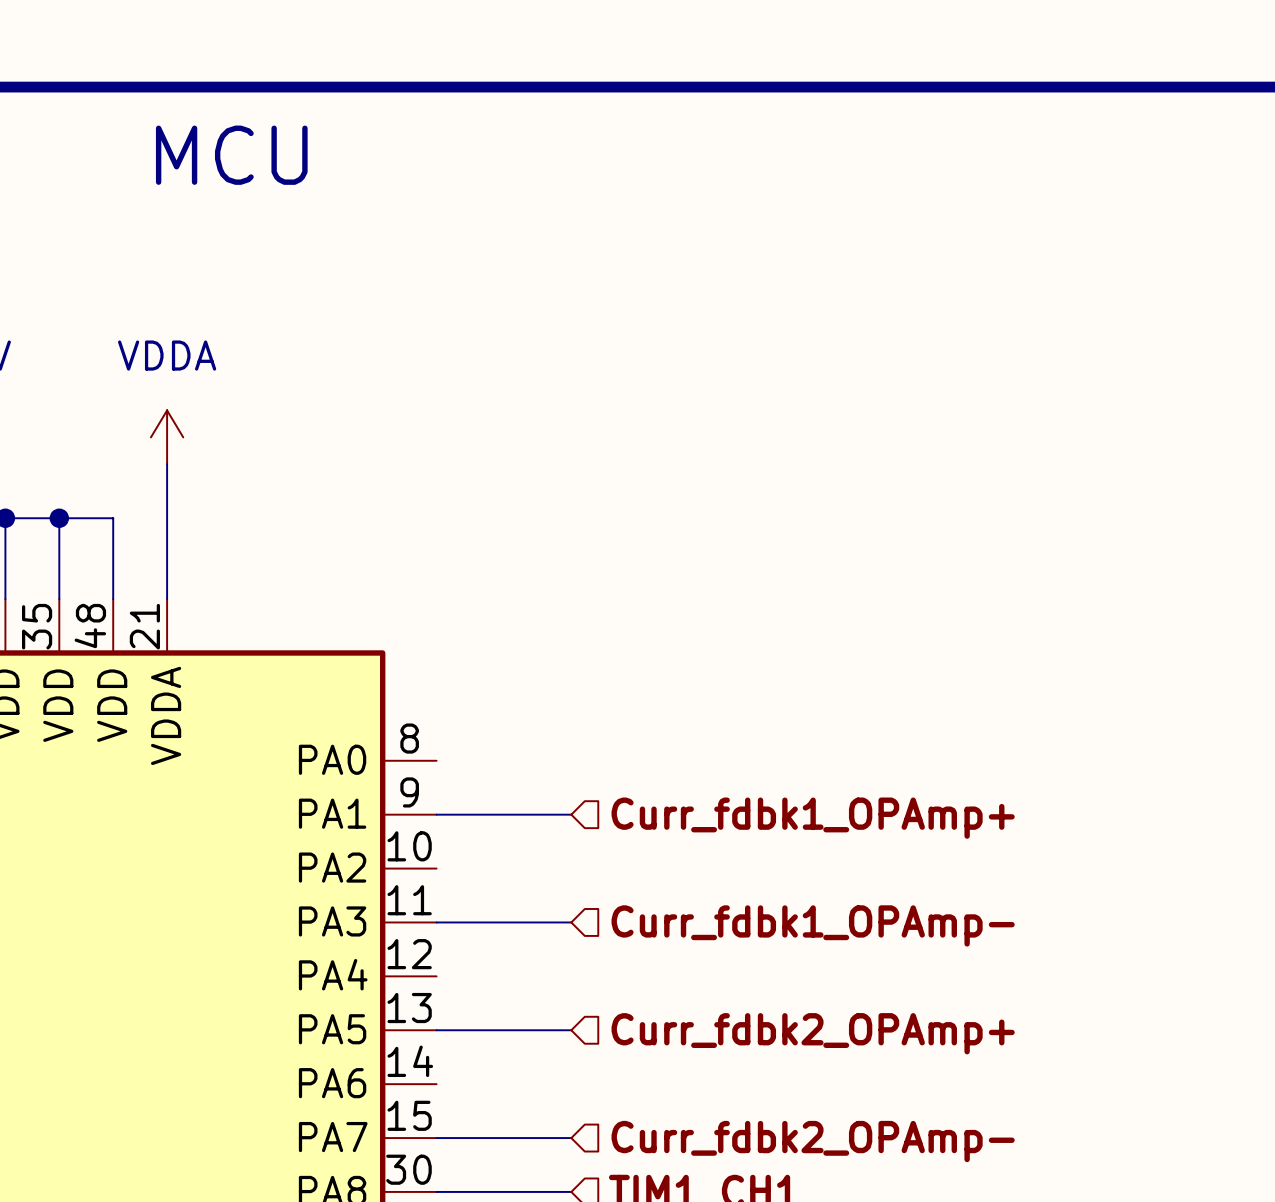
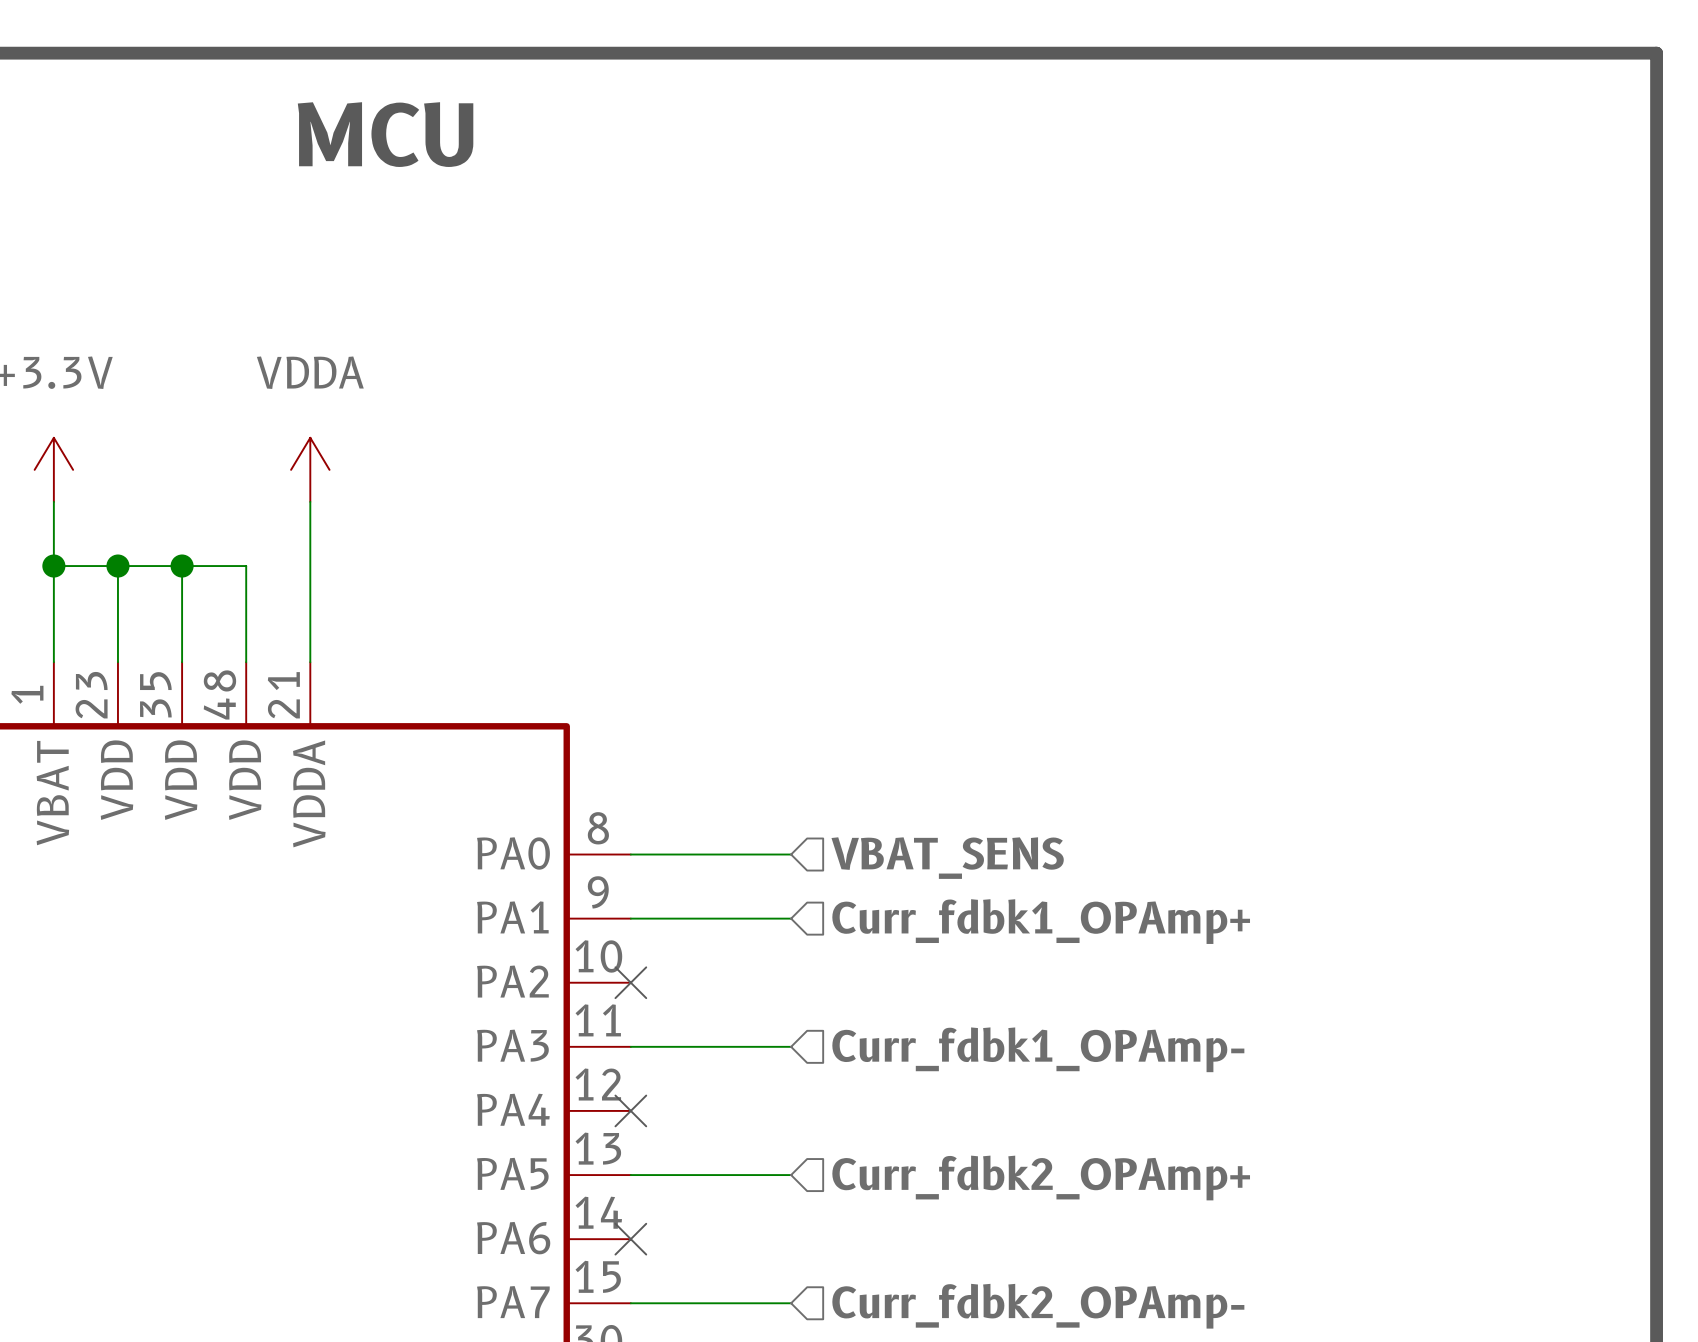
wire: none -> (630, 854) (791, 854)
hierarchical label: none -> VBAT_SENS (947, 858)
no-connect mark: none -> (630, 982)
no-connect mark: none -> (630, 1110)
no-connect mark: none -> (630, 1239)

